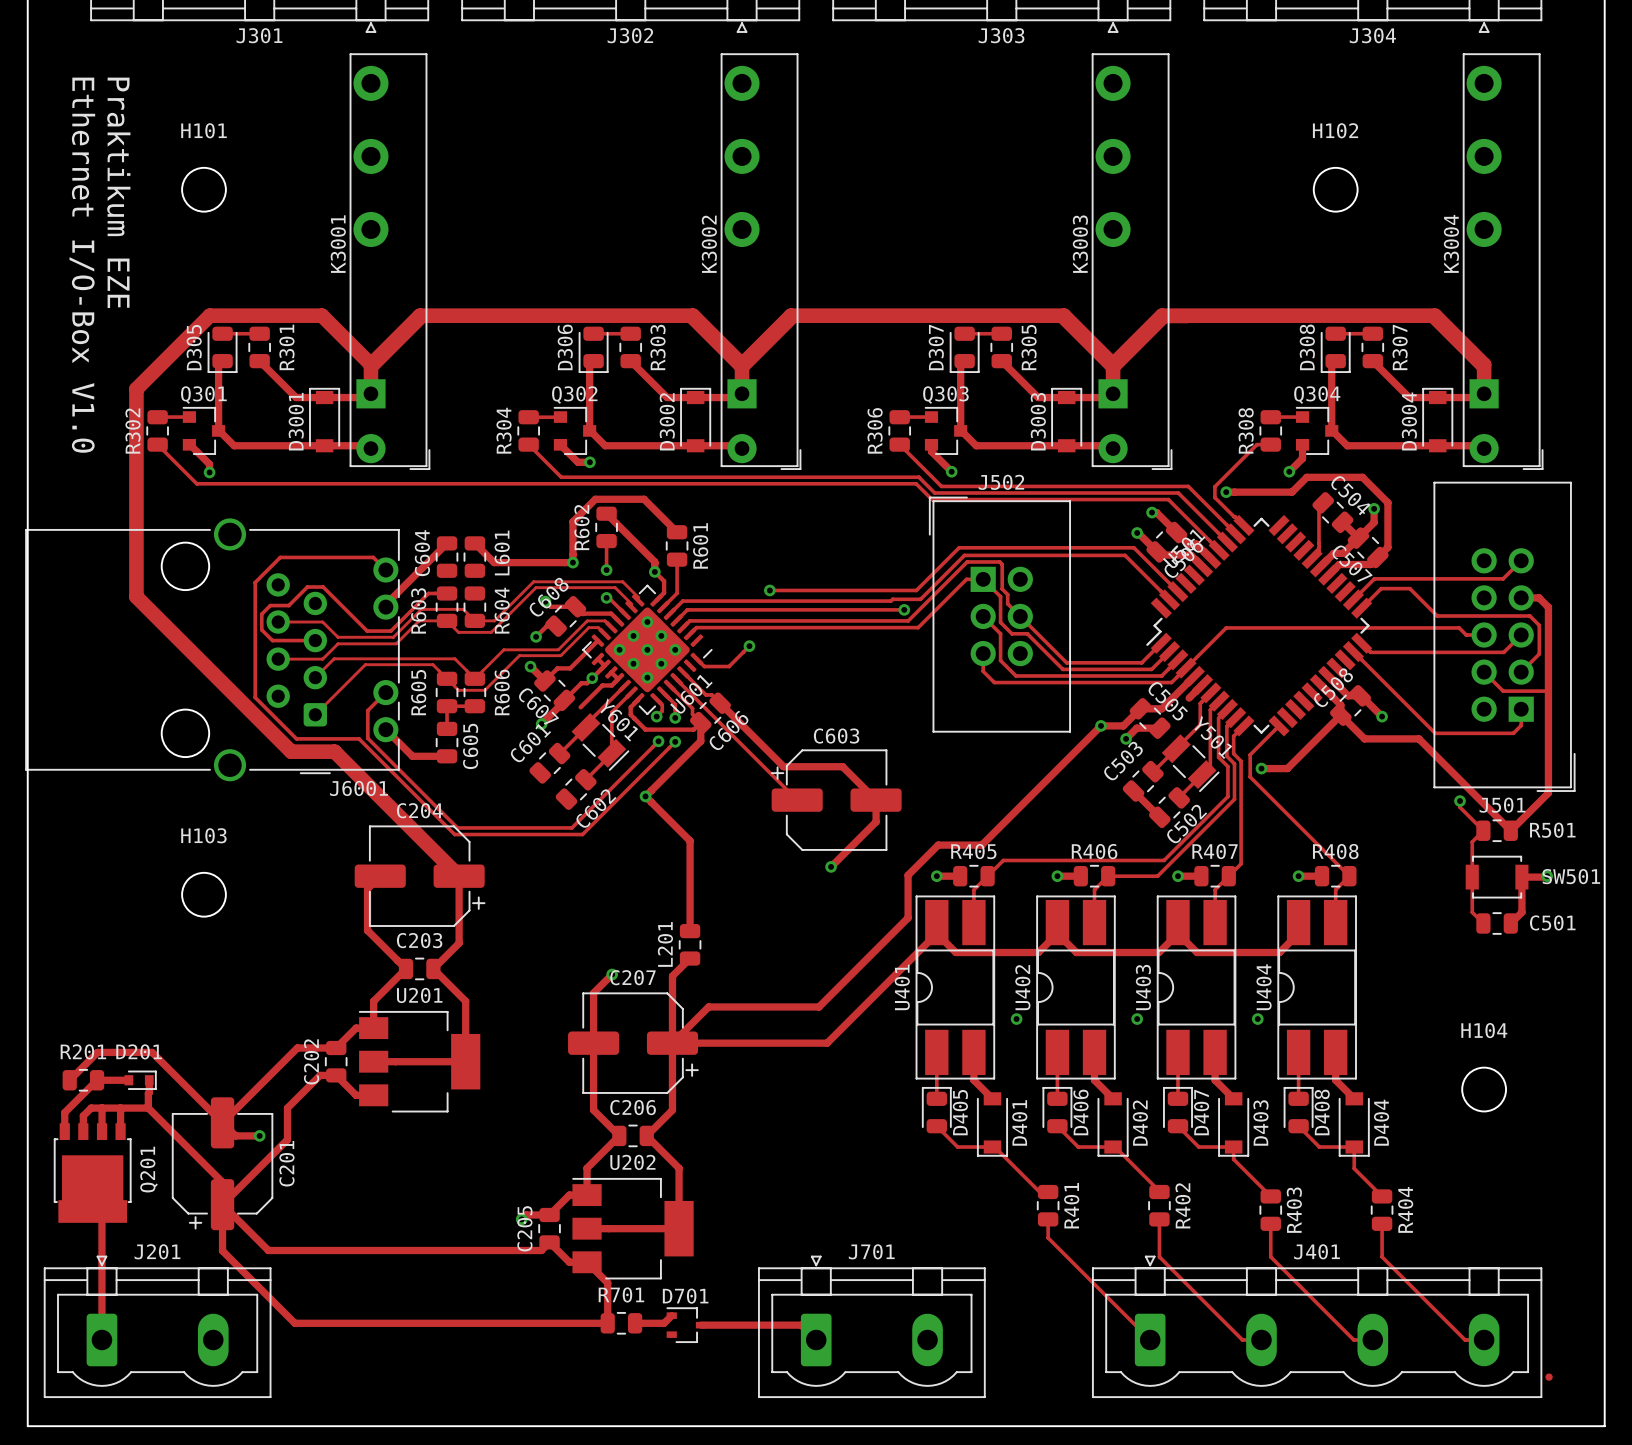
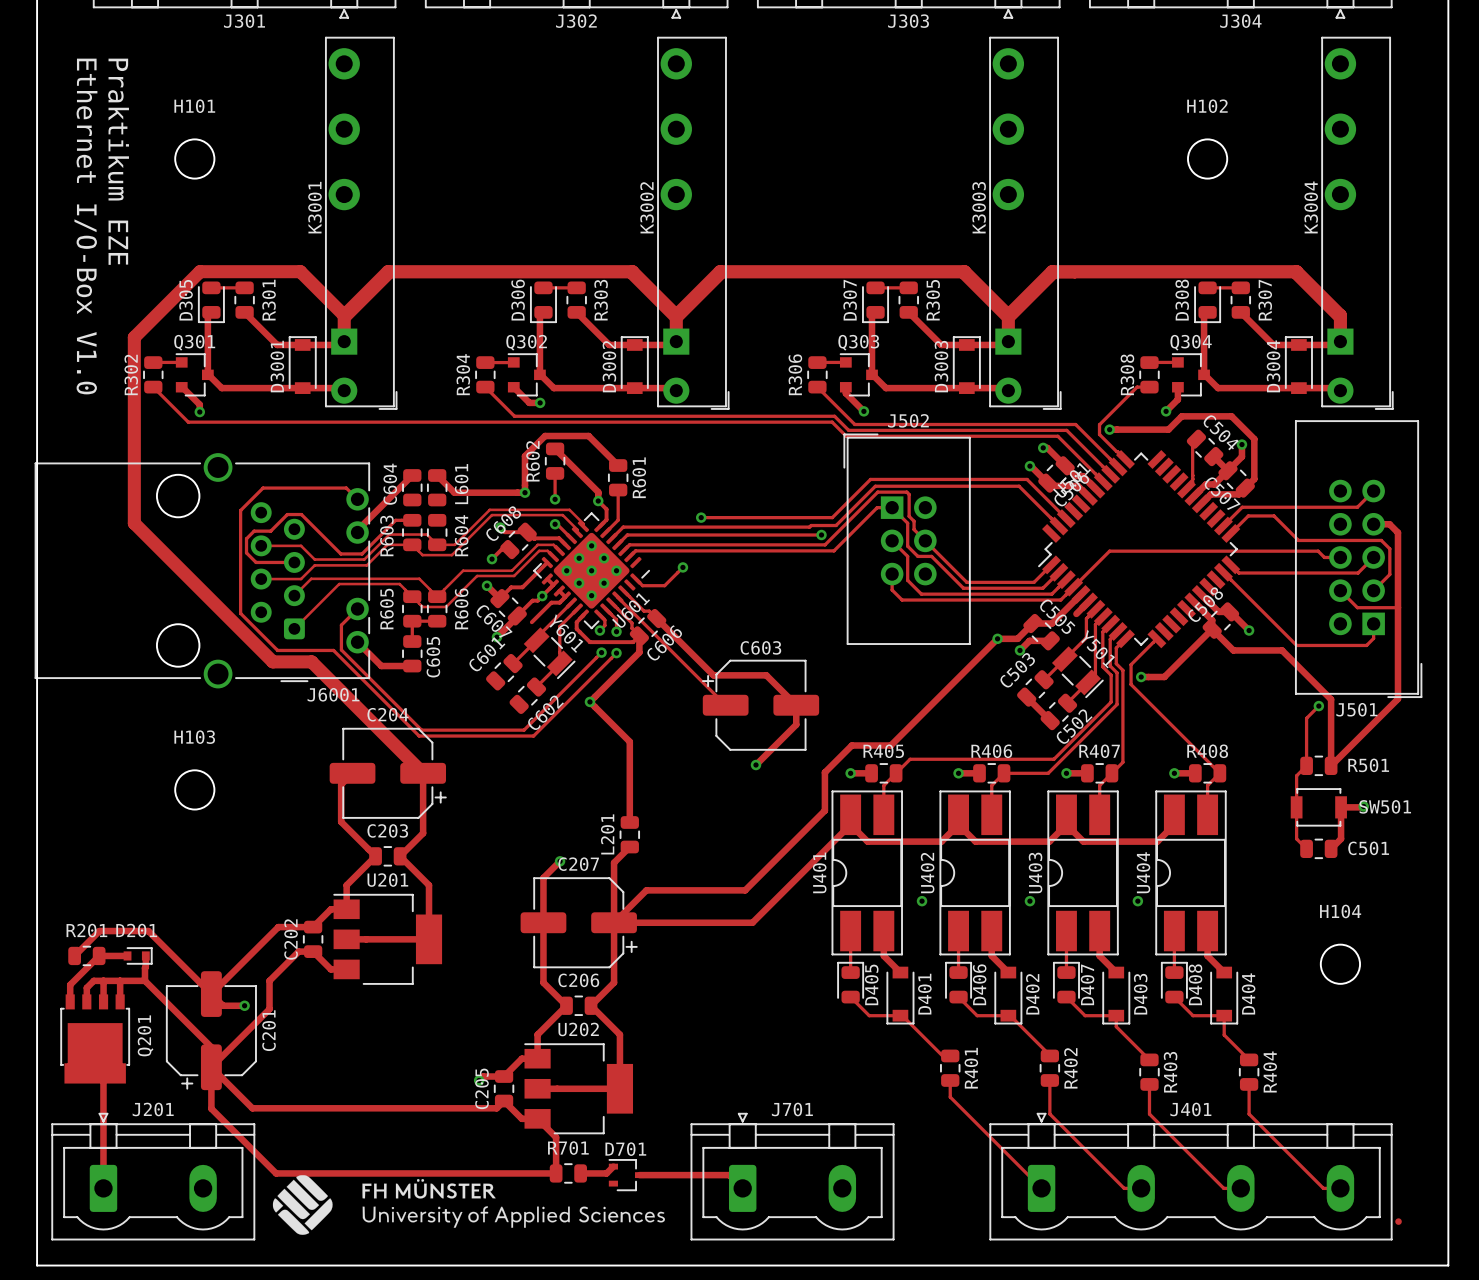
track: (1473, 793) (1510, 830) -> (1331, 699) (1331, 765) (1364, 732)
track: (1460, 801) (1460, 807) (1483, 830) (1472, 841) (1472, 912) (1483, 923) -> (1318, 706) (1306, 718) (1306, 765) (1296, 775) (1296, 838) (1306, 848)
R501 position: (1497, 830) -> (1318, 765)
track: (1547, 876) (1521, 877) (1521, 912) (1510, 923) -> (1363, 806) (1341, 807) (1341, 838) (1331, 848)
via position: (1547, 876) -> (1363, 806)
SW501 position: (1497, 877) -> (1318, 807)
C501 position: (1497, 923) -> (1318, 848)
drawing: none -> [272, 1175, 666, 1235]

